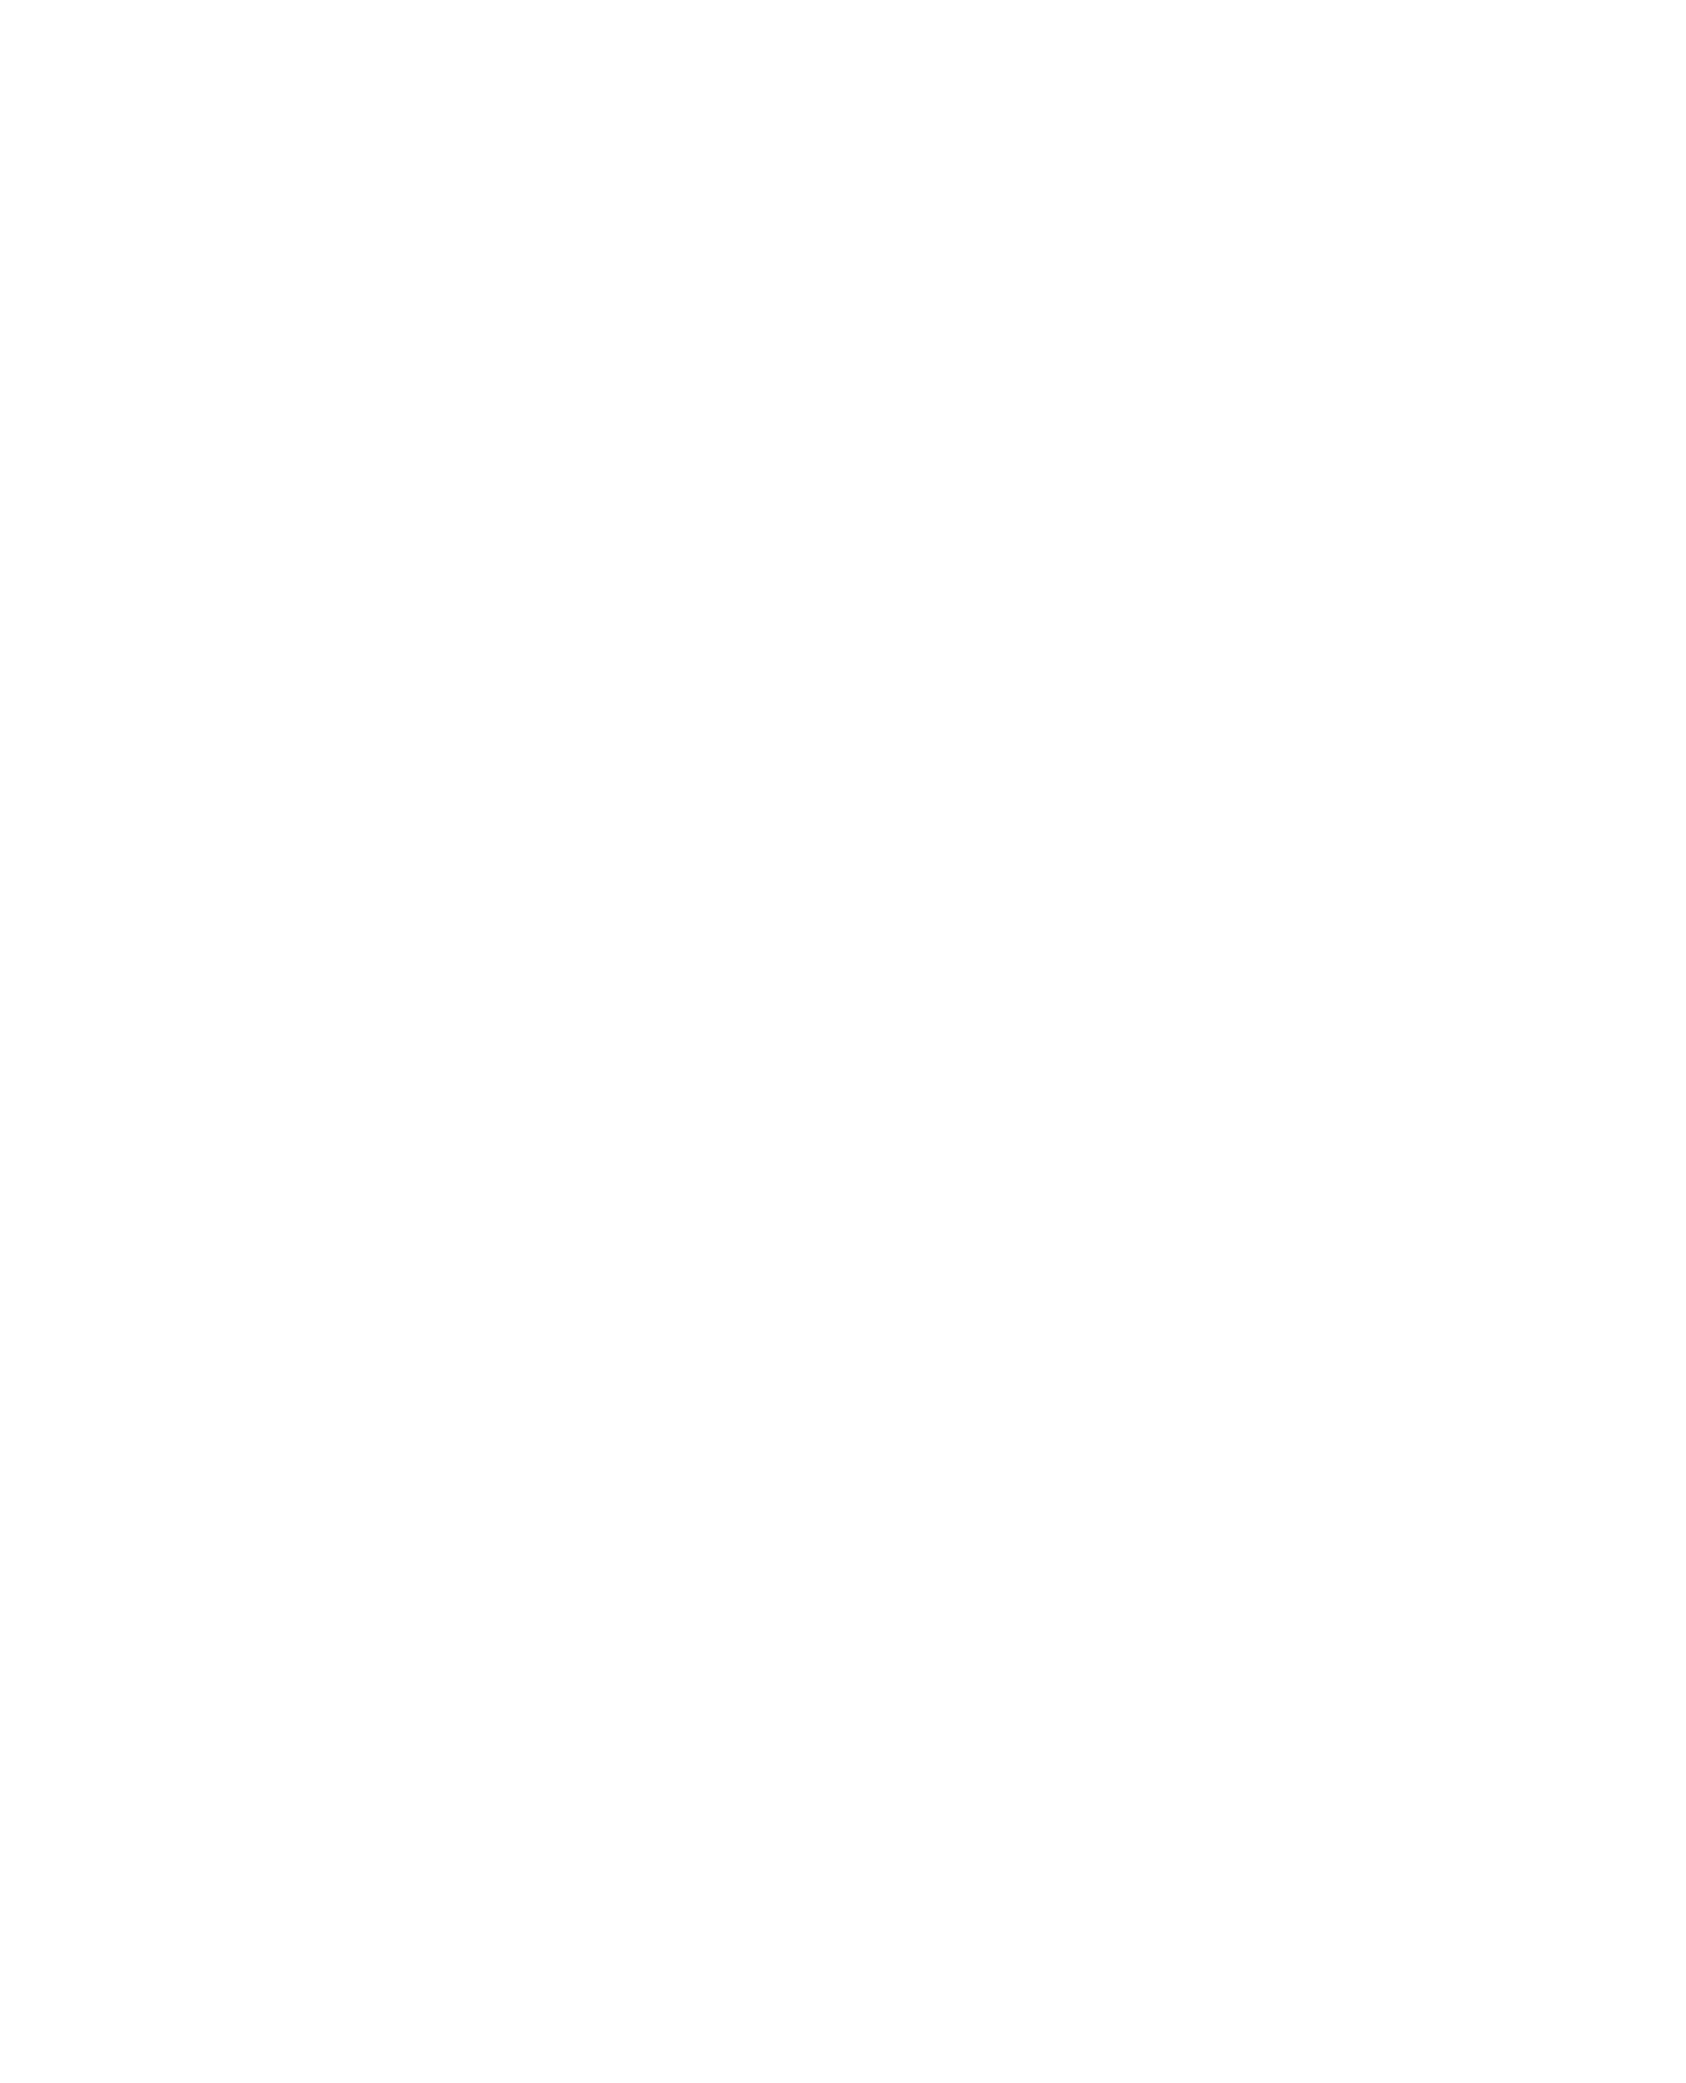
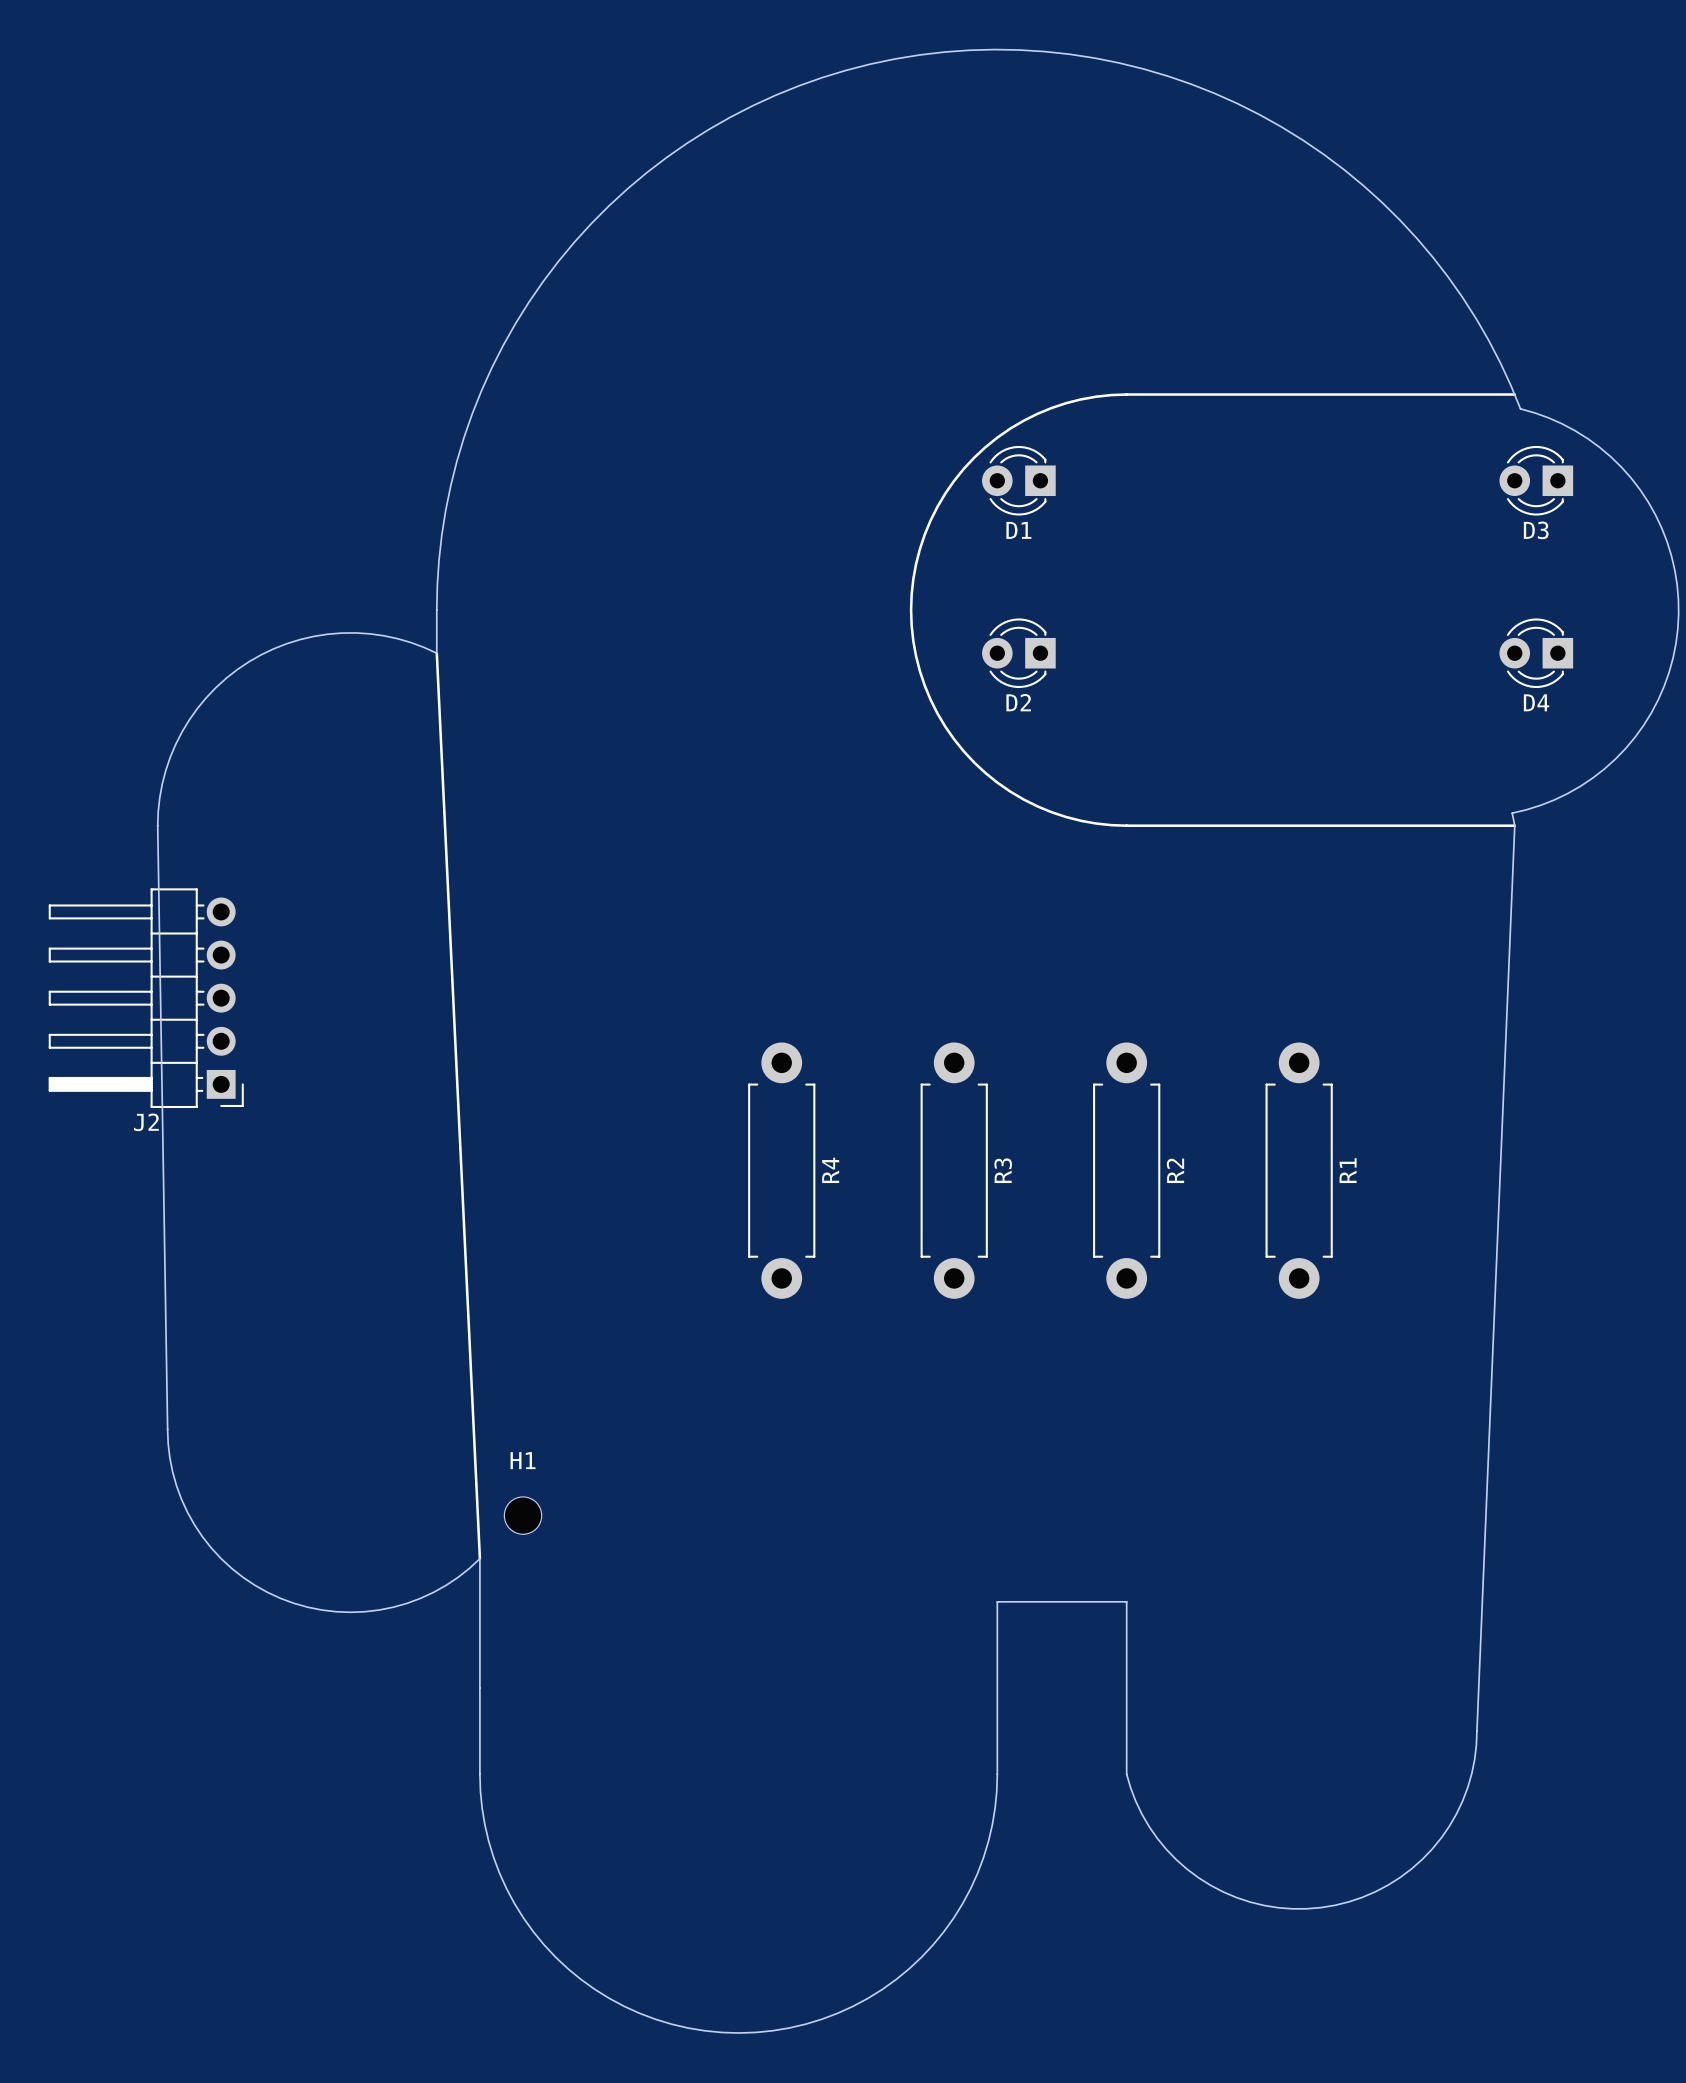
line: none -> (1514, 394) (1126, 394) (1096, 396) (1051, 408) (1023, 420) (997, 437) (974, 457) (945, 493) (930, 520) (919, 549) (913, 579) (911, 610) (913, 640) (919, 670) (930, 699) (945, 726) (974, 762) (997, 782) (1023, 799) (1051, 812) (1096, 823) (1126, 825) (1514, 825)
board edge: none -> (1520, 408) (1562, 423) (1587, 438) (1610, 456) (1640, 489) (1655, 514) (1667, 541) (1677, 584) (1678, 614) (1673, 658) (1664, 686) (1651, 712) (1635, 737) (1604, 769) (1580, 786) (1540, 805) (1512, 813) (1514, 825) (1476, 1745) (1471, 1773) (1456, 1813) (1441, 1837) (1411, 1868) (1388, 1885) (1348, 1901) (1320, 1907) (1292, 1908) (1263, 1905) (1223, 1891) (1198, 1877) (1166, 1849) (1141, 1814) (1130, 1788) (1126, 1774) (1126, 1601) (997, 1601) (997, 1774) (992, 1824) (983, 1857) (970, 1888) (943, 1931) (921, 1957) (896, 1979) (853, 2006) (805, 2024) (772, 2030) (721, 2032) (688, 2028) (655, 2019) (609, 1998) (568, 1968) (533, 1931) (506, 1888) (488, 1841) (482, 1808) (479, 1774) (479, 1558) (446, 1585) (420, 1598) (393, 1607) (350, 1612) (307, 1607) (267, 1592) (231, 1568) (202, 1536) (187, 1512) (176, 1485) (169, 1457) (167, 1429) (157, 825) (162, 784) (170, 757) (182, 731) (197, 708) (226, 678) (249, 661) (287, 643) (314, 636) (355, 632) (397, 638) (436, 653) (439, 560) (445, 510) (456, 461) (472, 413) (491, 367) (515, 323) (543, 281) (574, 242) (609, 205) (646, 172) (687, 143) (730, 117) (775, 95) (822, 77) (870, 64) (919, 54) (969, 50) (1019, 50) (1069, 54) (1119, 62) (1167, 76) (1214, 93) (1259, 114) (1303, 140) (1343, 169) (1381, 202) (1416, 238) (1448, 277) (1476, 318) (1500, 362) (1520, 408)
D1: none -> (1018, 480)
D3: none -> (1536, 480)
line: none -> (436, 653) (479, 1558)
D2: none -> (1018, 653)
D4: none -> (1536, 653)
J2: none -> (146, 998)
R4: none -> (781, 1170)
R3: none -> (954, 1170)
R2: none -> (1126, 1170)
R1: none -> (1299, 1170)
H1: none -> (523, 1515)

